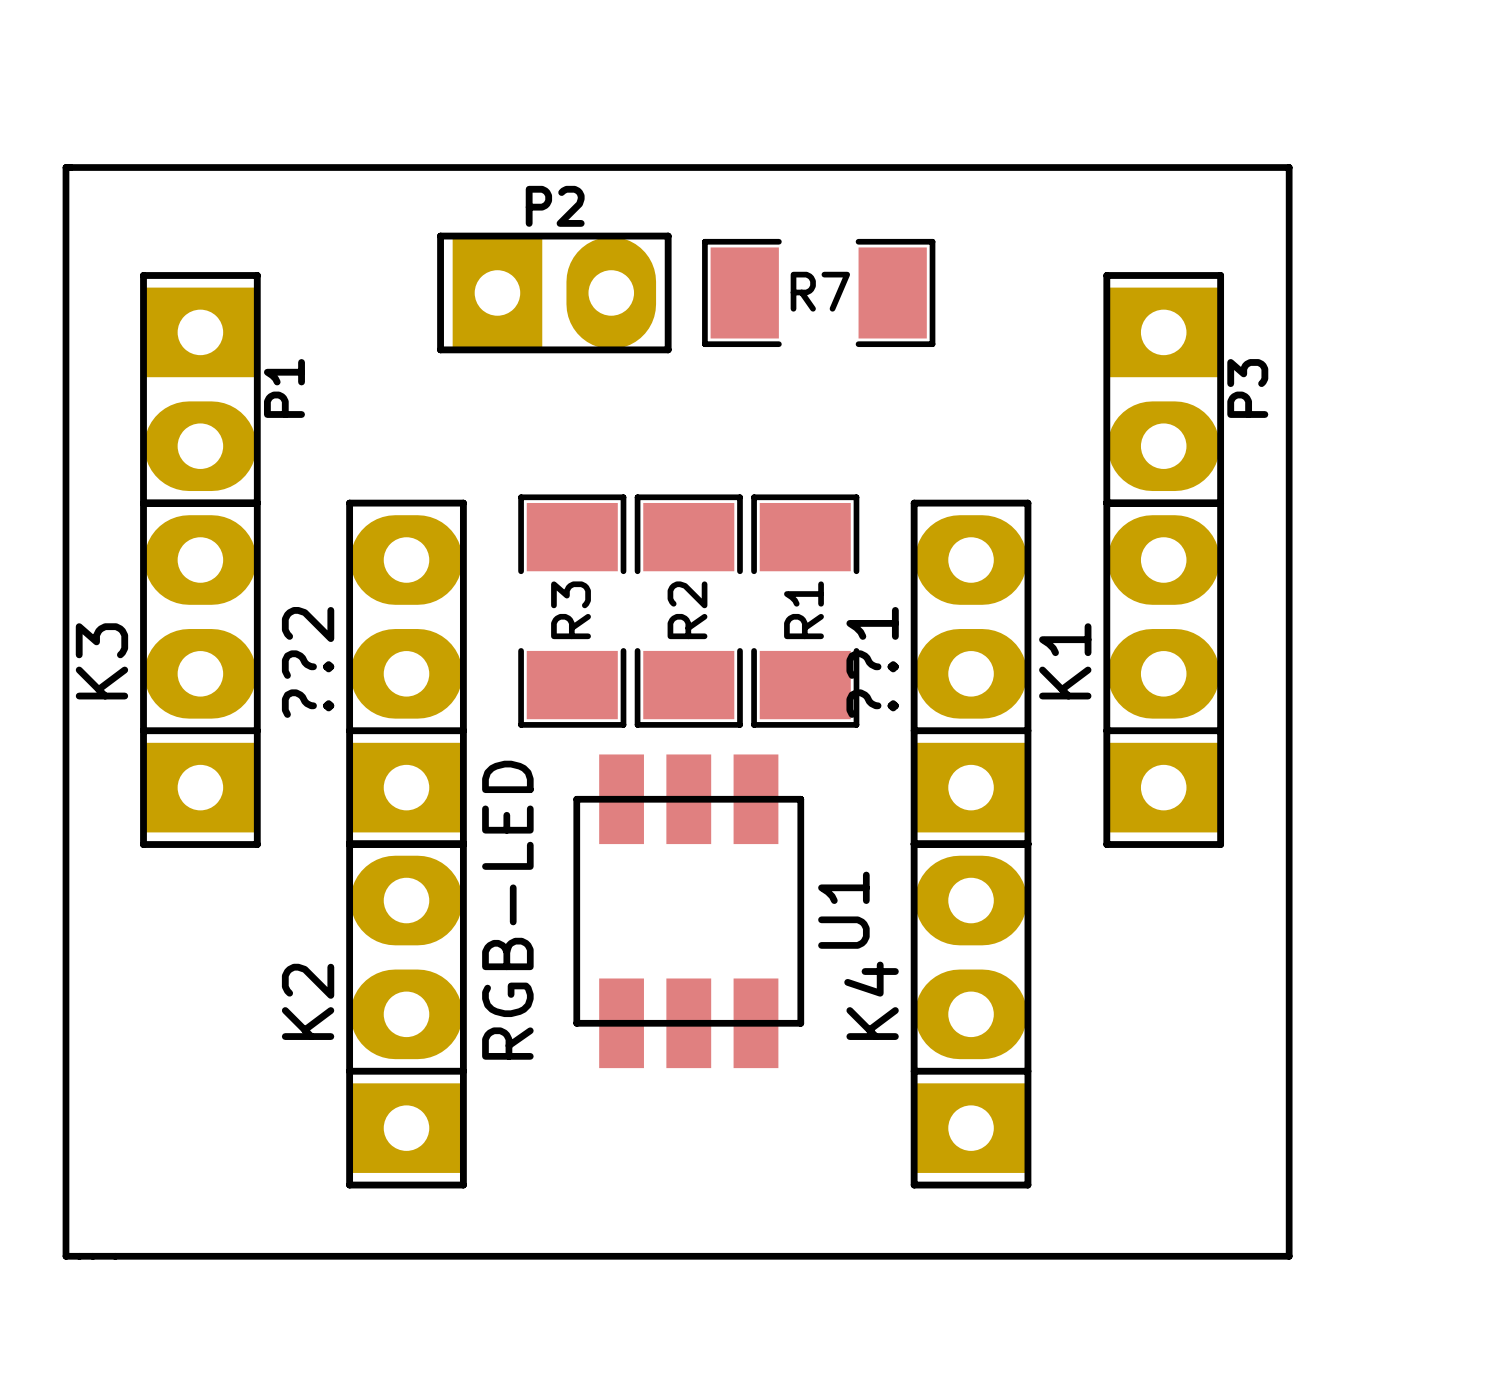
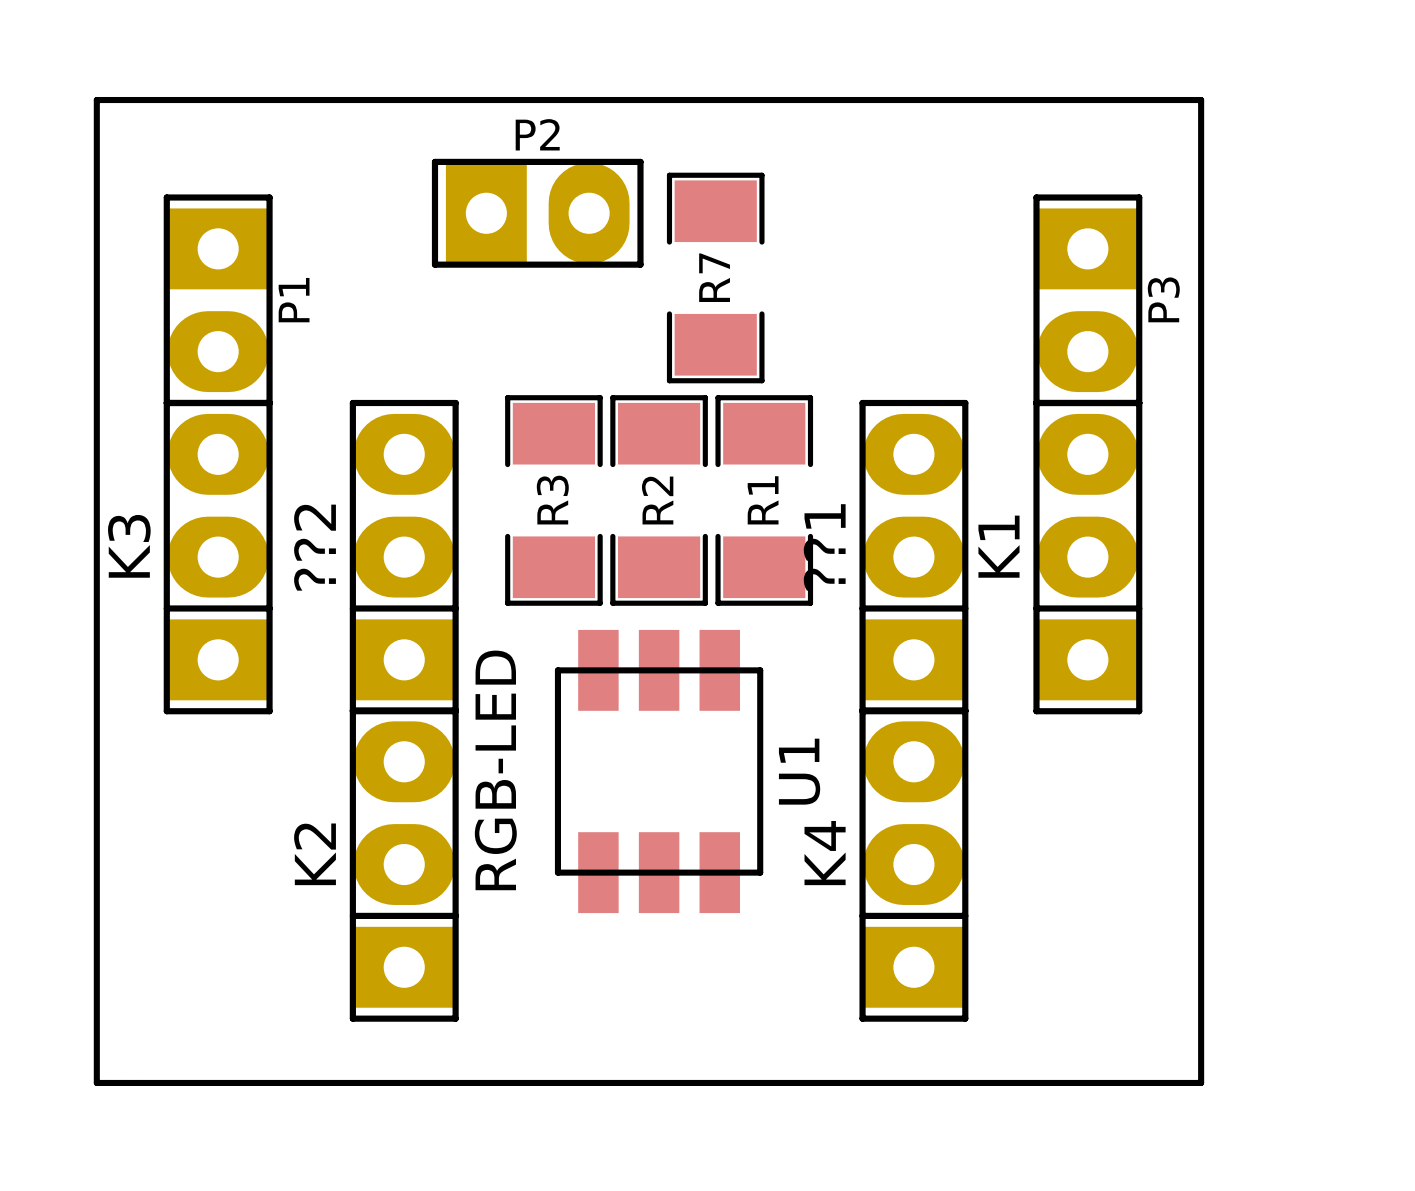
R7 rotation: 0° (818, 292) -> 90° clockwise (715, 278)

